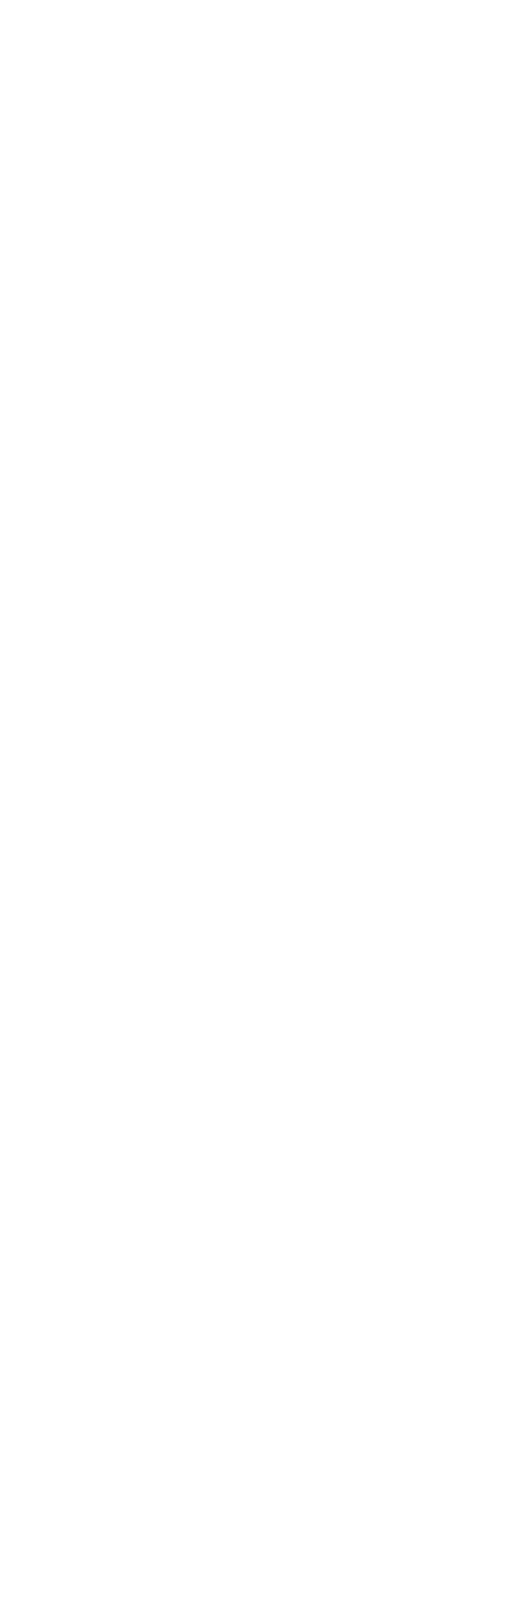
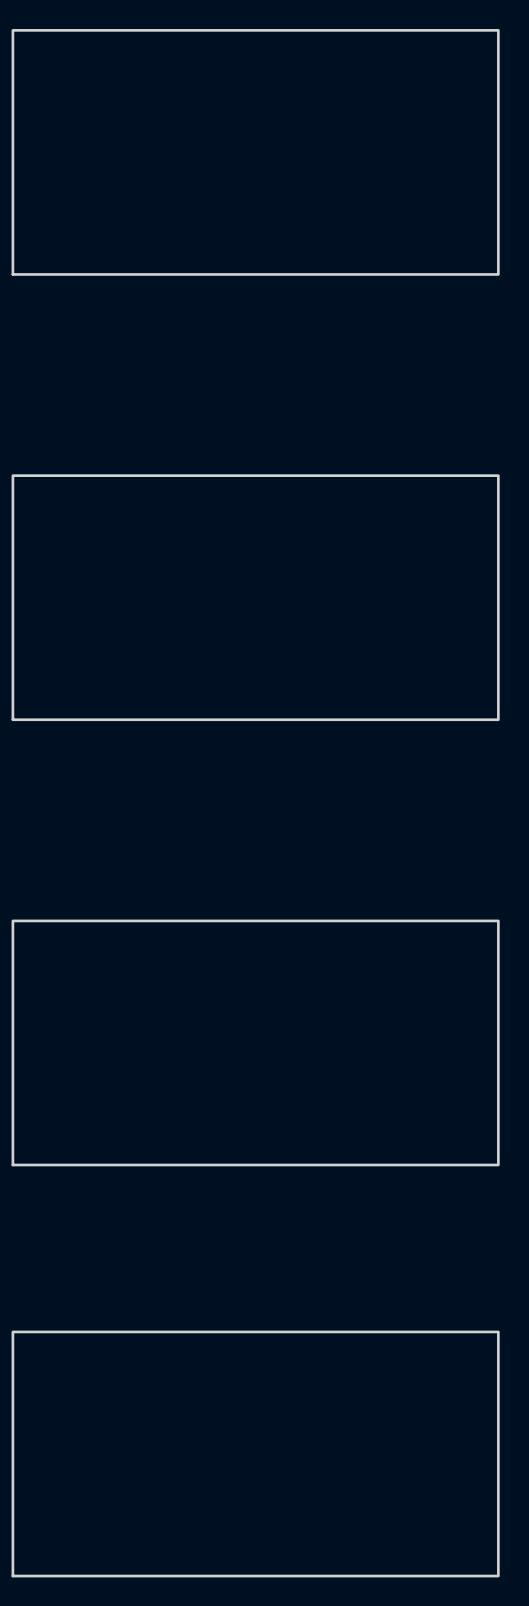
part: none -> (255, 152)
part: none -> (255, 597)
part: none -> (255, 1042)
part: none -> (255, 1453)

